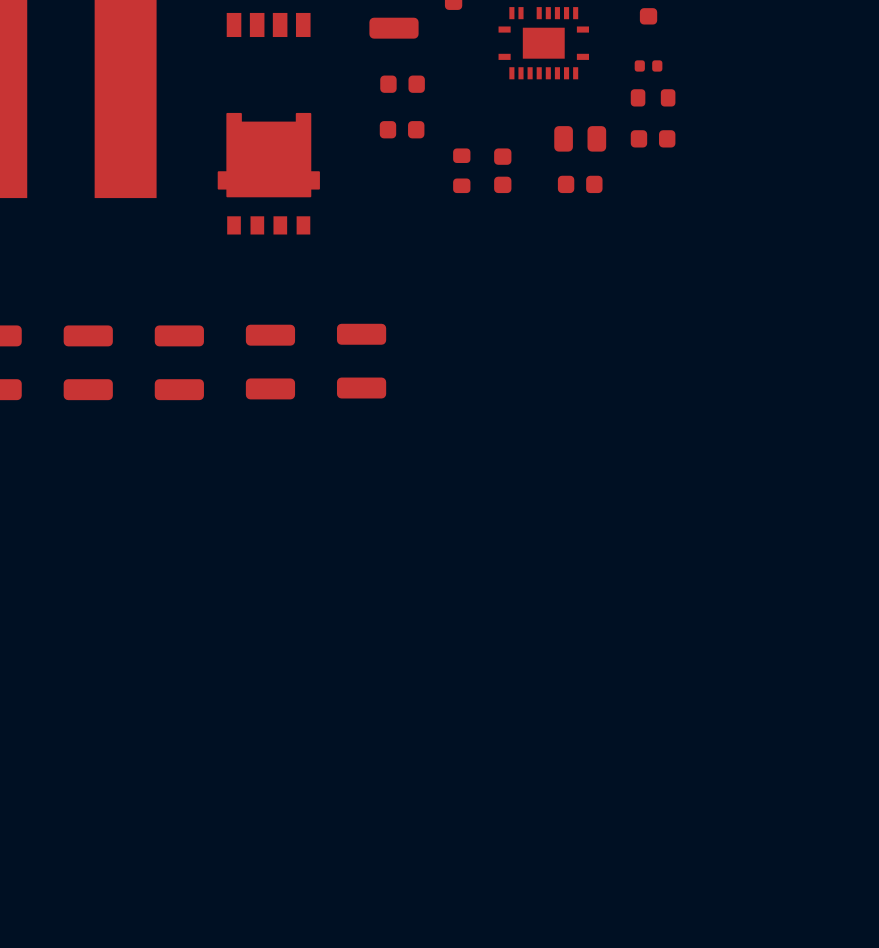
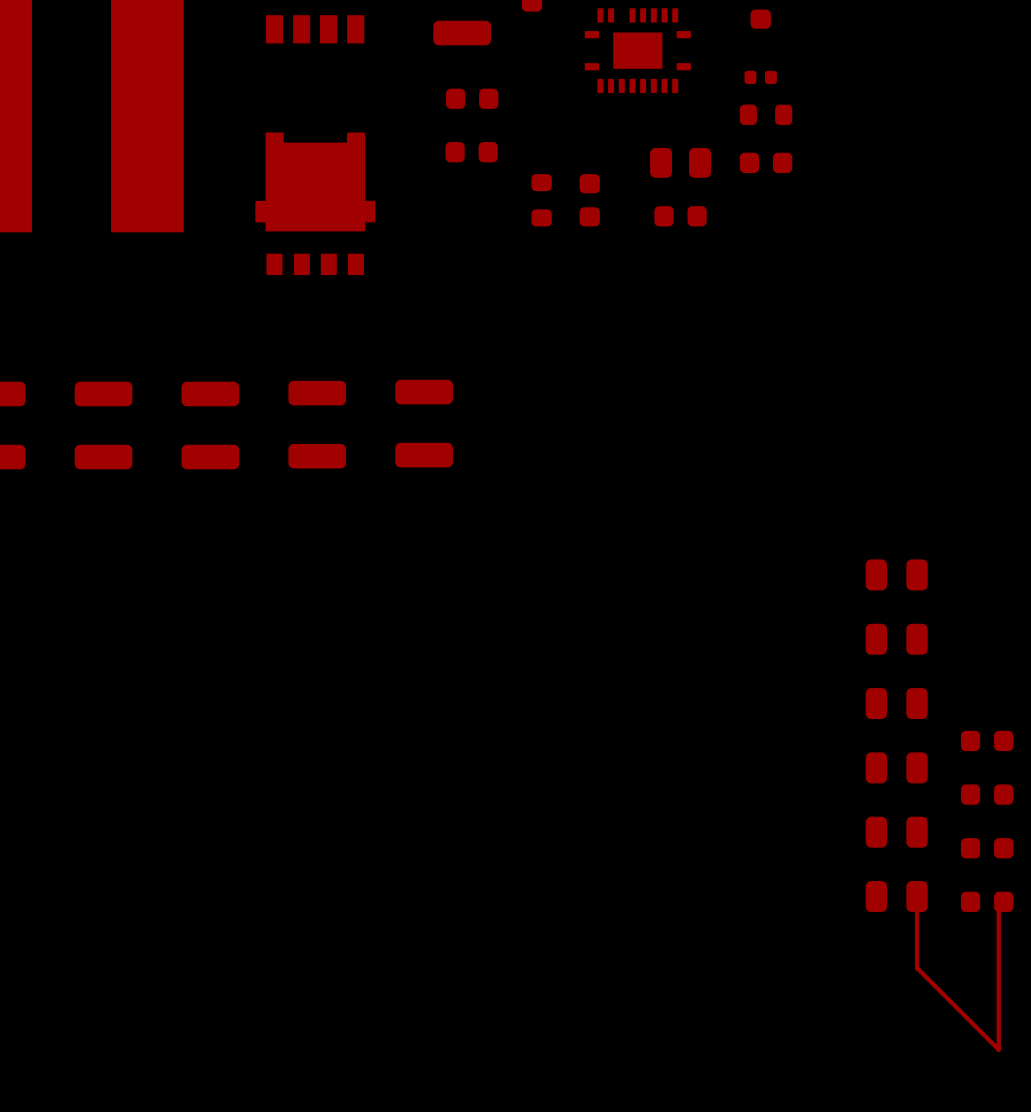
part: none -> (896, 574)
part: none -> (896, 639)
part: none -> (896, 703)
part: none -> (987, 740)
part: none -> (896, 767)
part: none -> (987, 794)
part: none -> (896, 832)
part: none -> (987, 848)
part: none -> (896, 896)
top track: none -> (917, 896) (917, 968) (998, 1049) (998, 906) (1003, 901)
part: none -> (987, 901)

